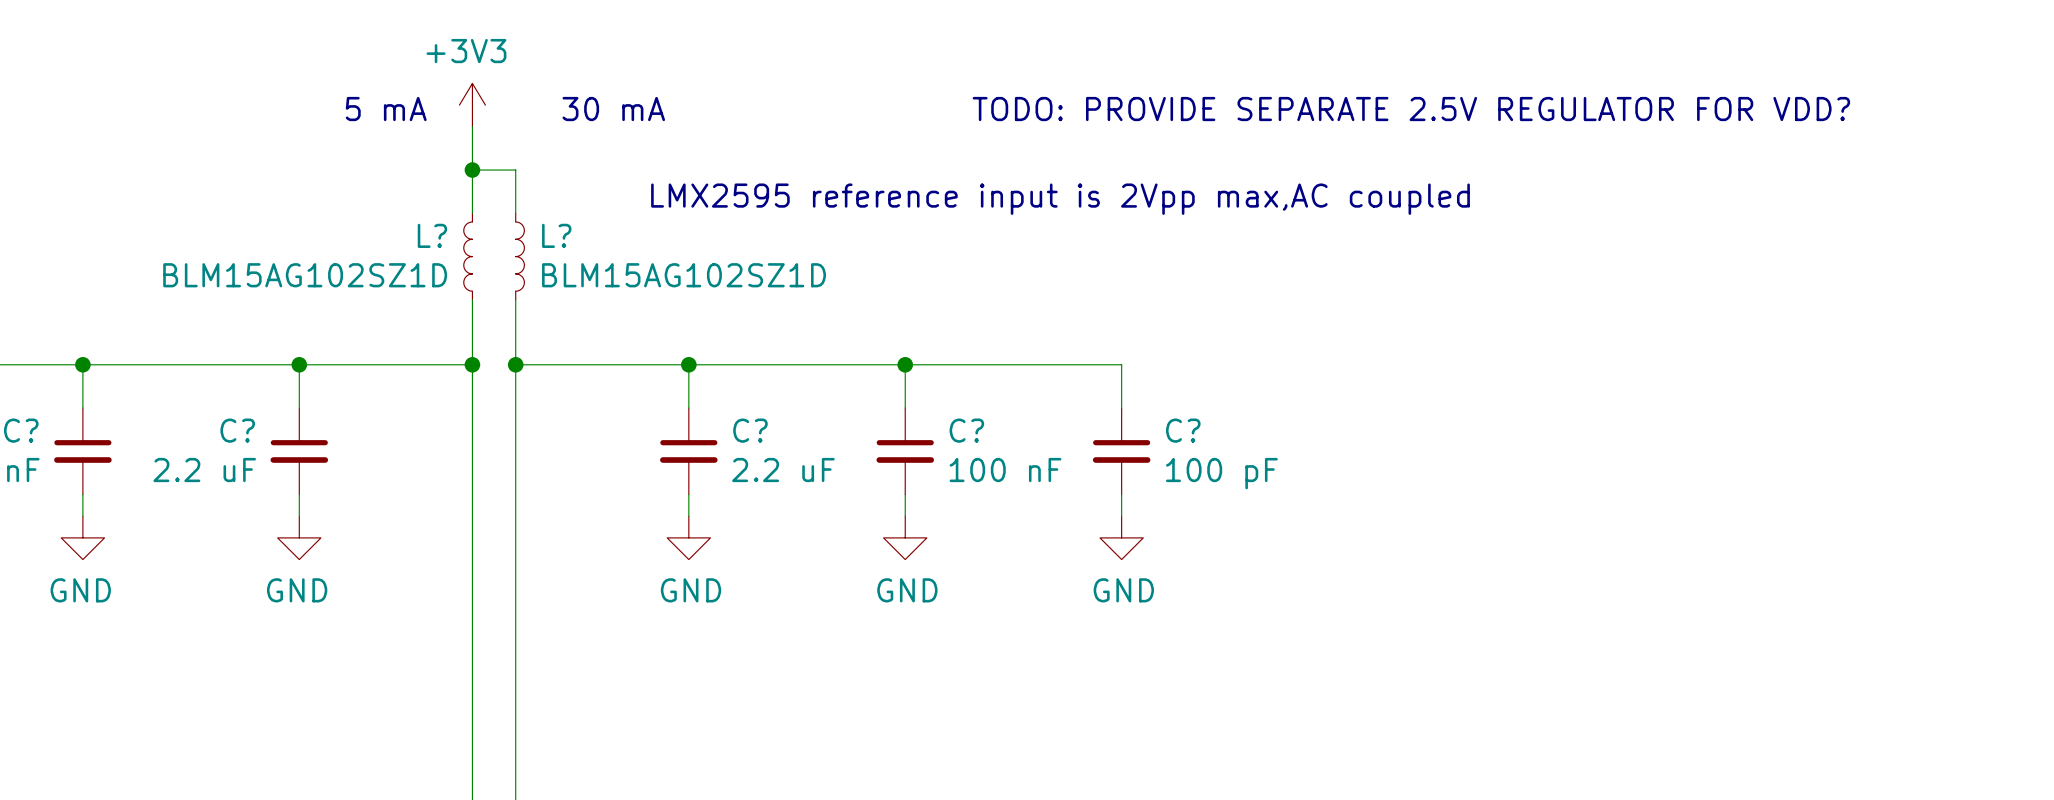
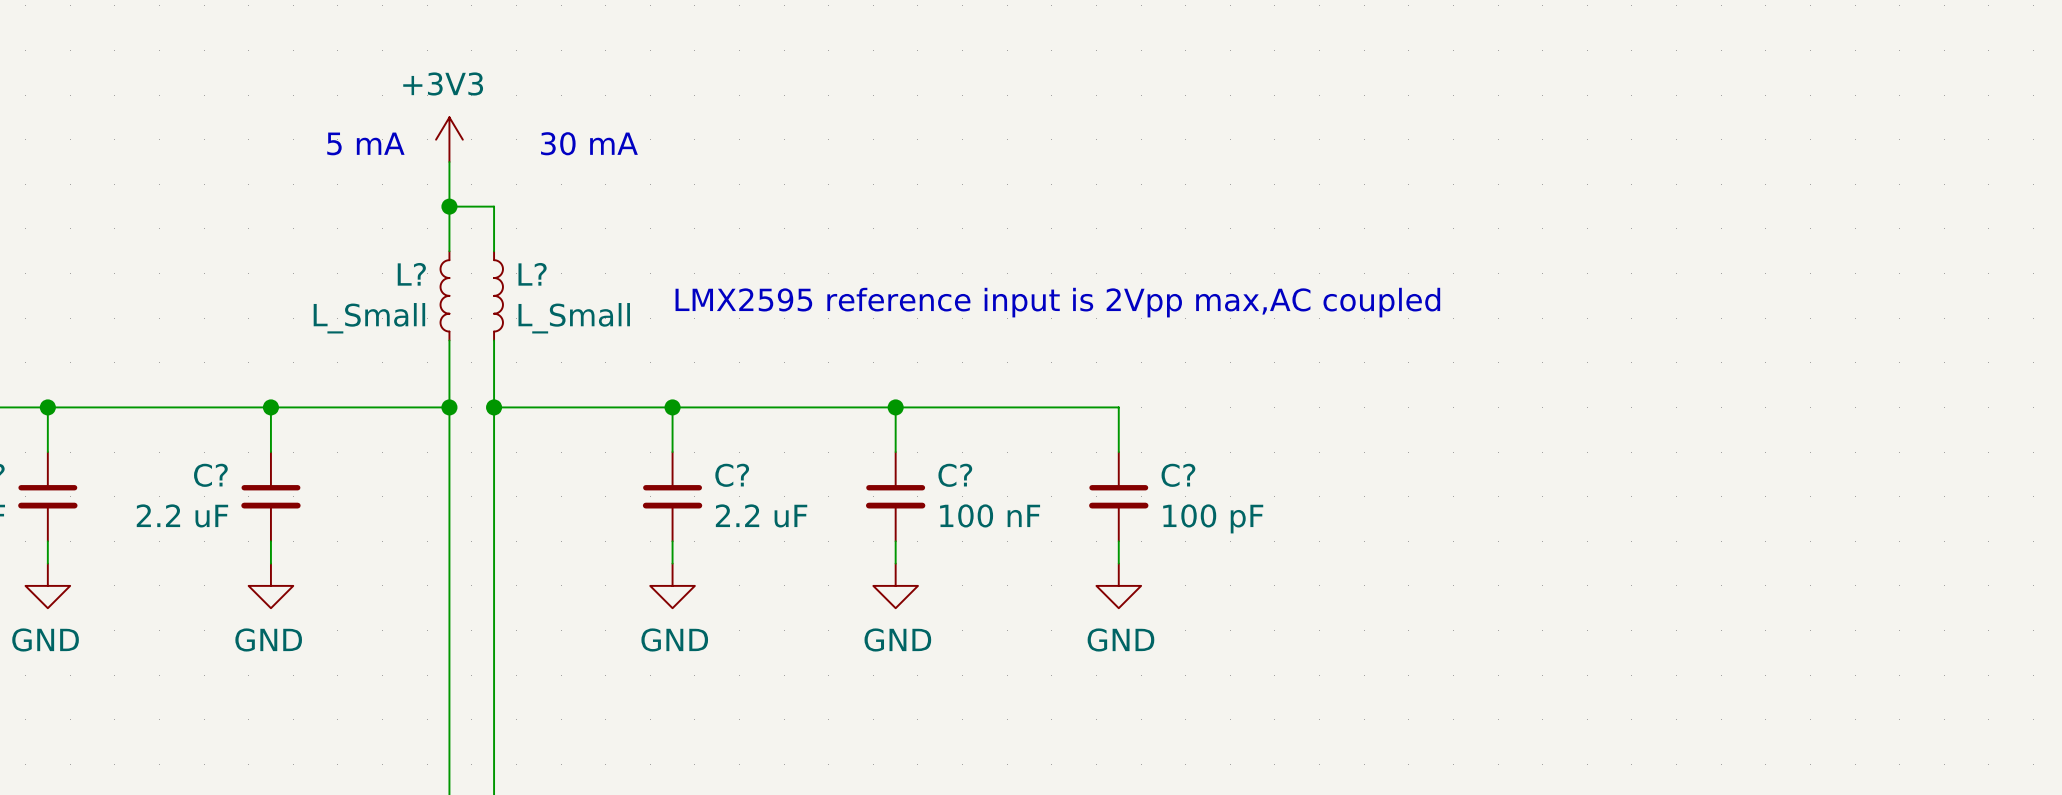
text: TODO: PROVIDE SEPARATE 2.5V REGULATOR FOR VDD? (1411, 109) -> none
text position: LMX2595 reference input is 2Vpp max,AC coupled (1060, 199) -> LMX2595 reference input is 2Vpp max,AC coupled (1057, 302)
L? value: BLM15AG102SZ1D (305, 275) -> L_Small (369, 318)
L? value: BLM15AG102SZ1D (684, 275) -> L_Small (574, 318)

